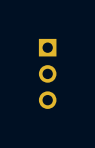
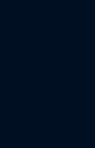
part: (47, 73) -> none

